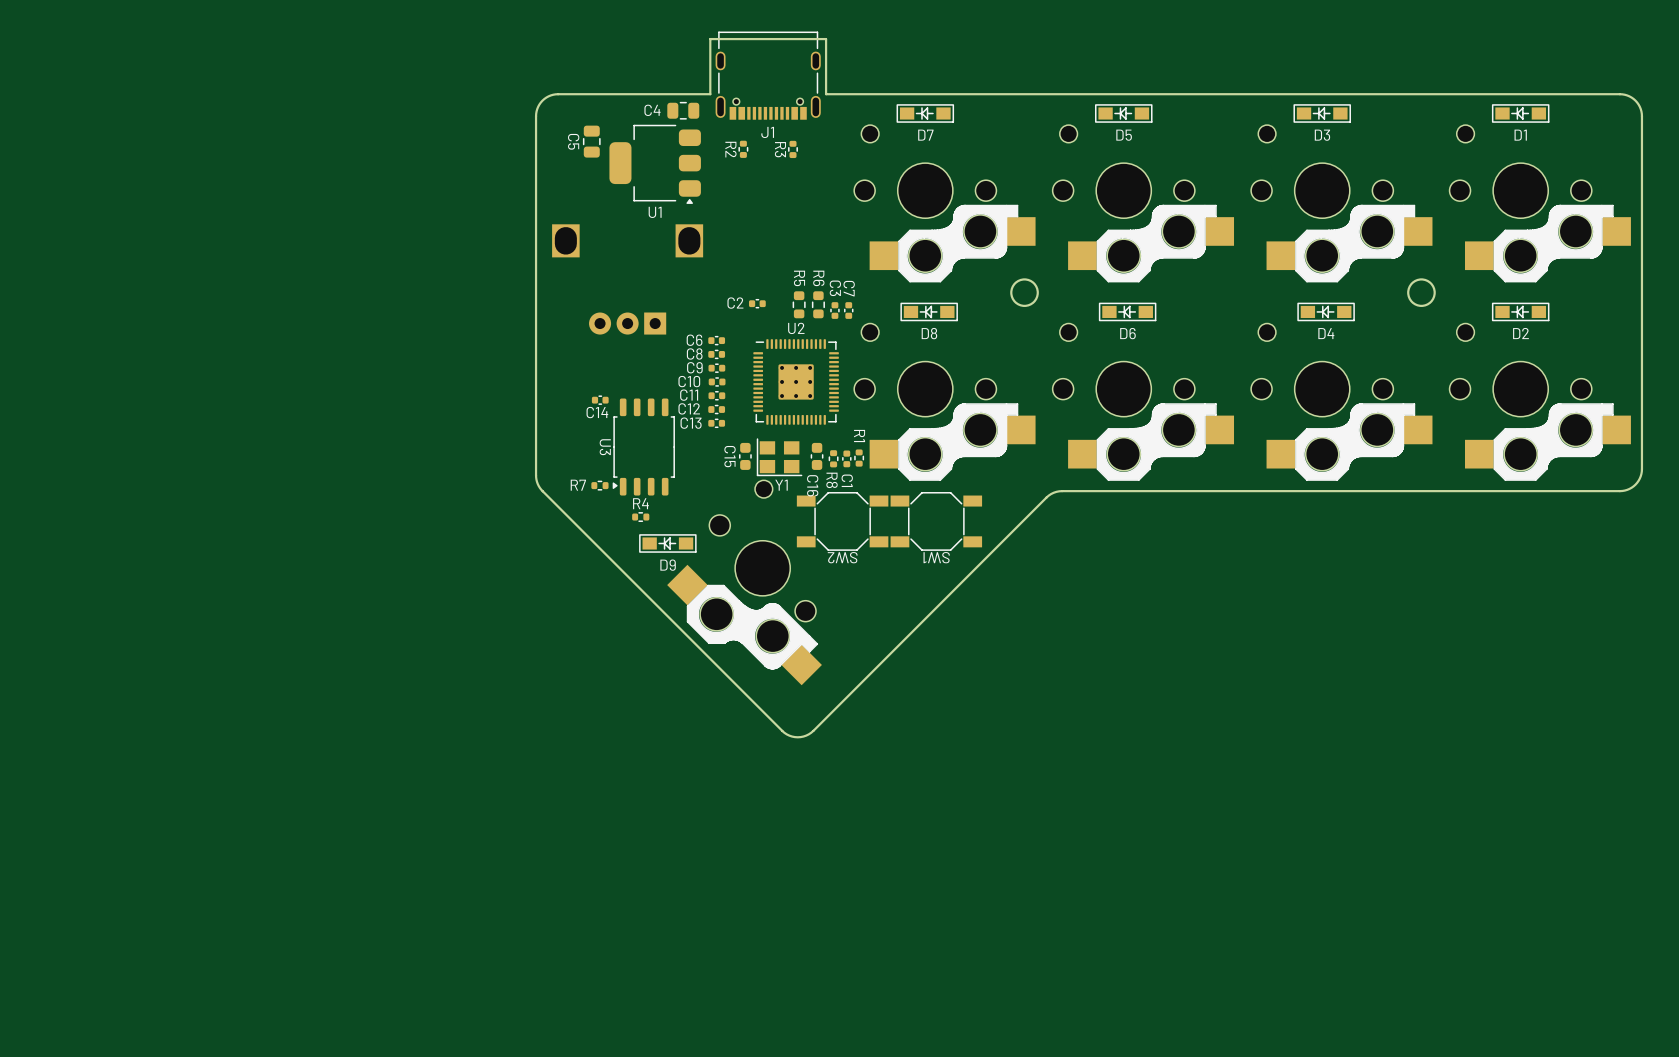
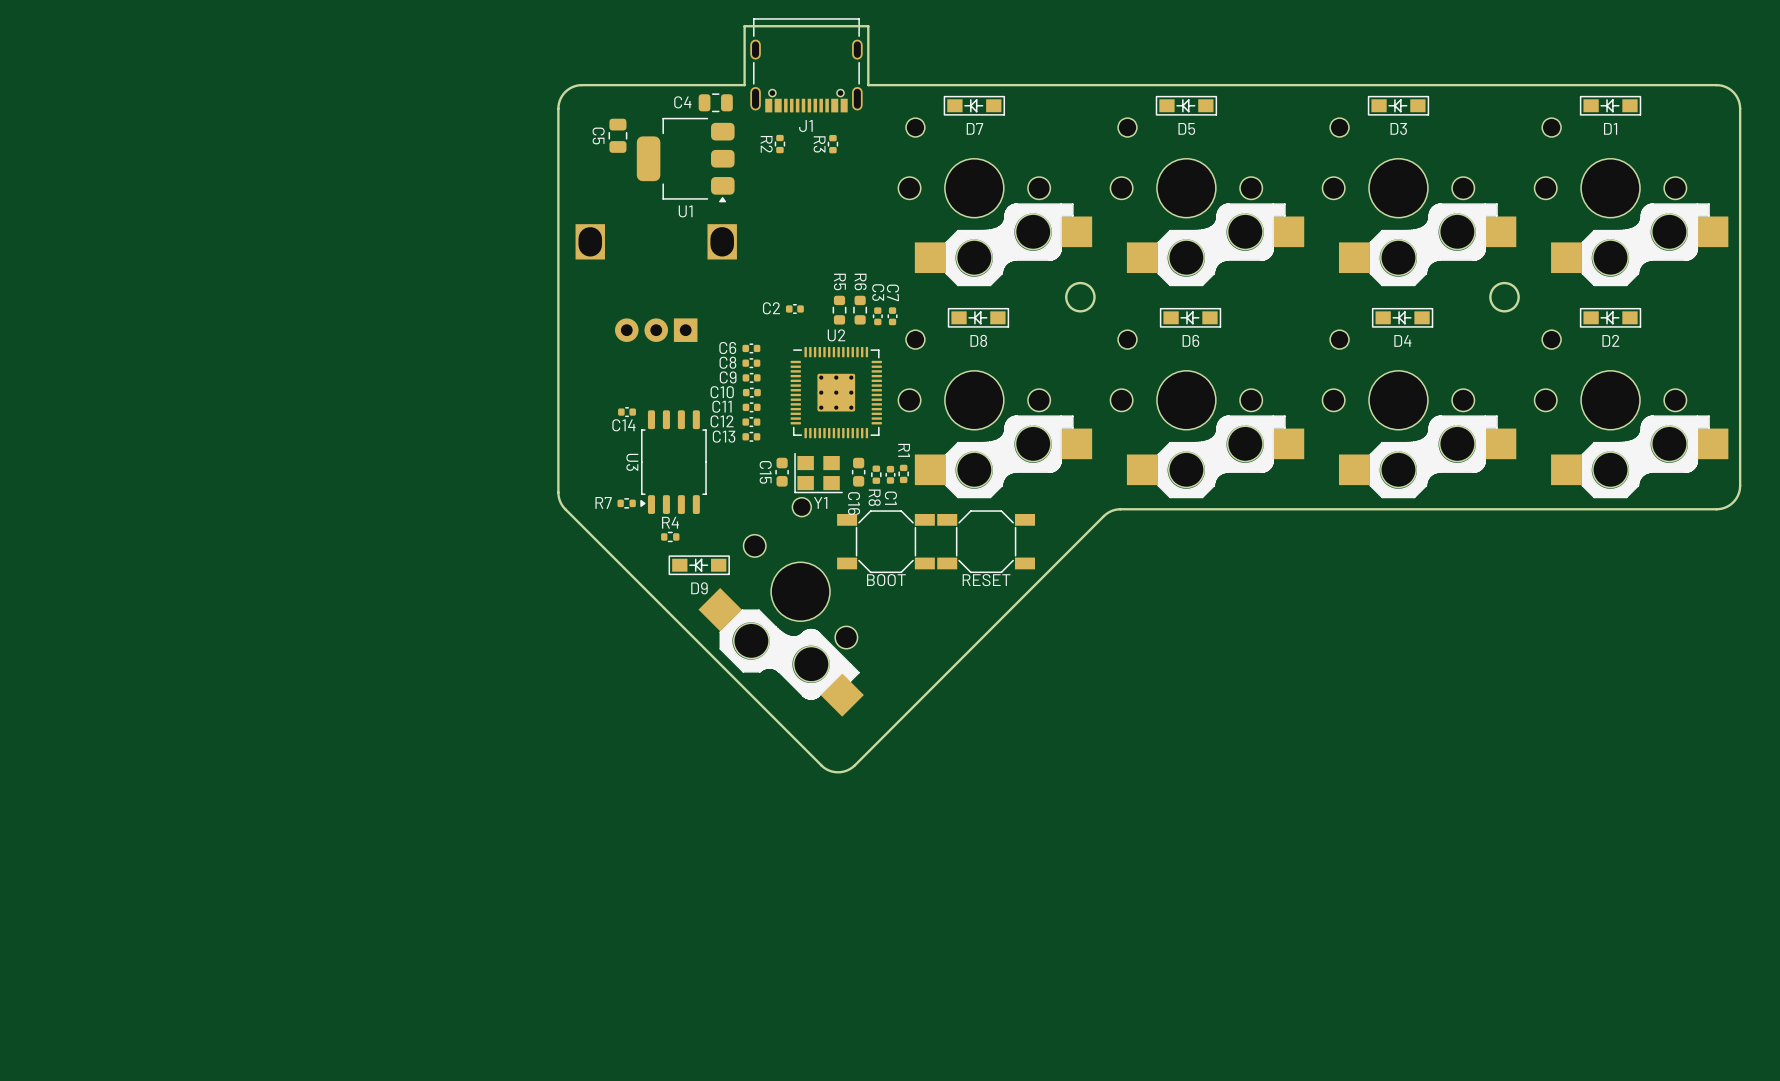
SW2 name: SW2 (842, 557) -> none
SW2 value: none -> BOOT (886, 580)
SW1 name: SW1 (936, 557) -> none
SW1 value: none -> RESET (986, 580)

